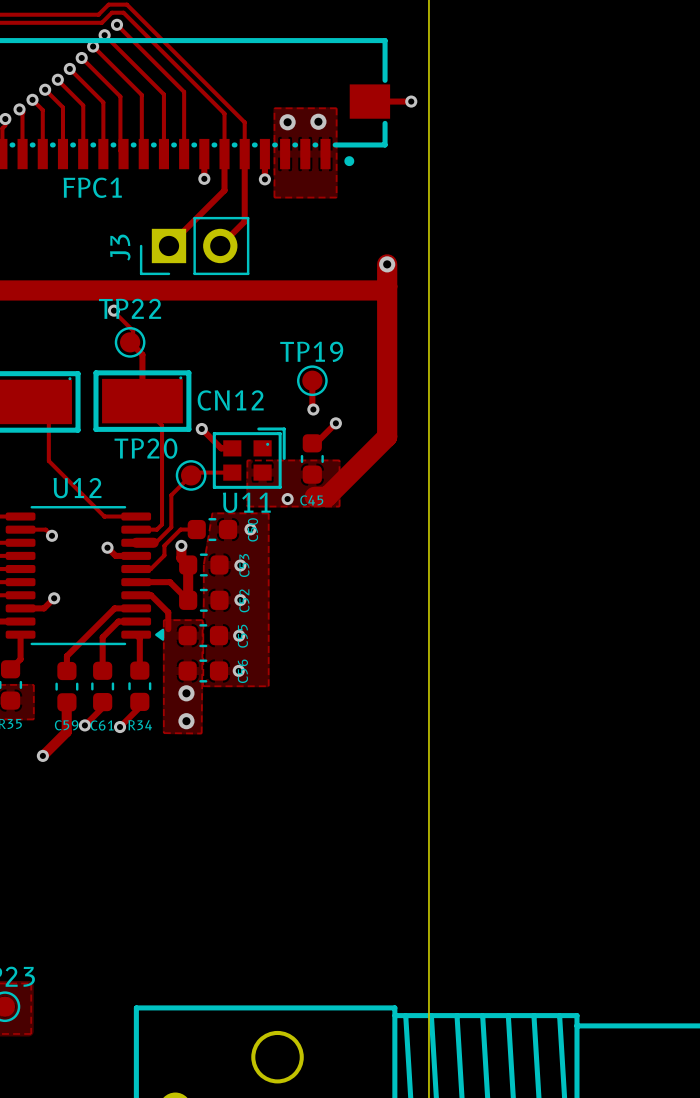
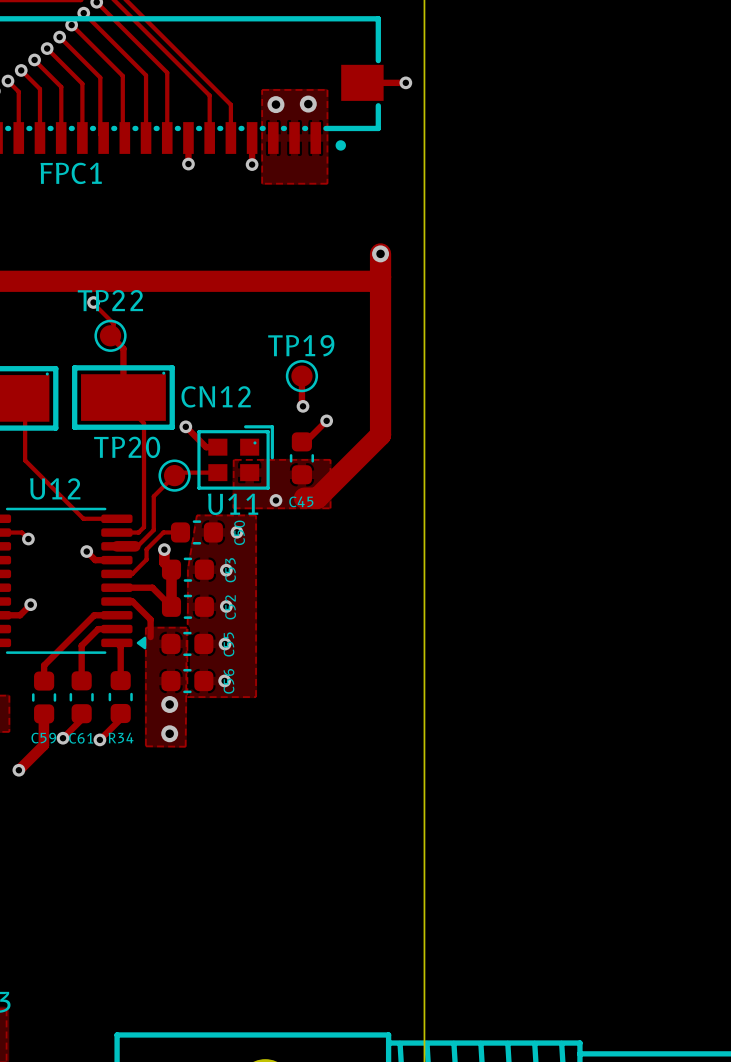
track: (224, 154) (224, 190) (168, 245) -> none
track: (244, 154) (244, 221) (220, 245) -> none
J3: (194, 245) -> none

